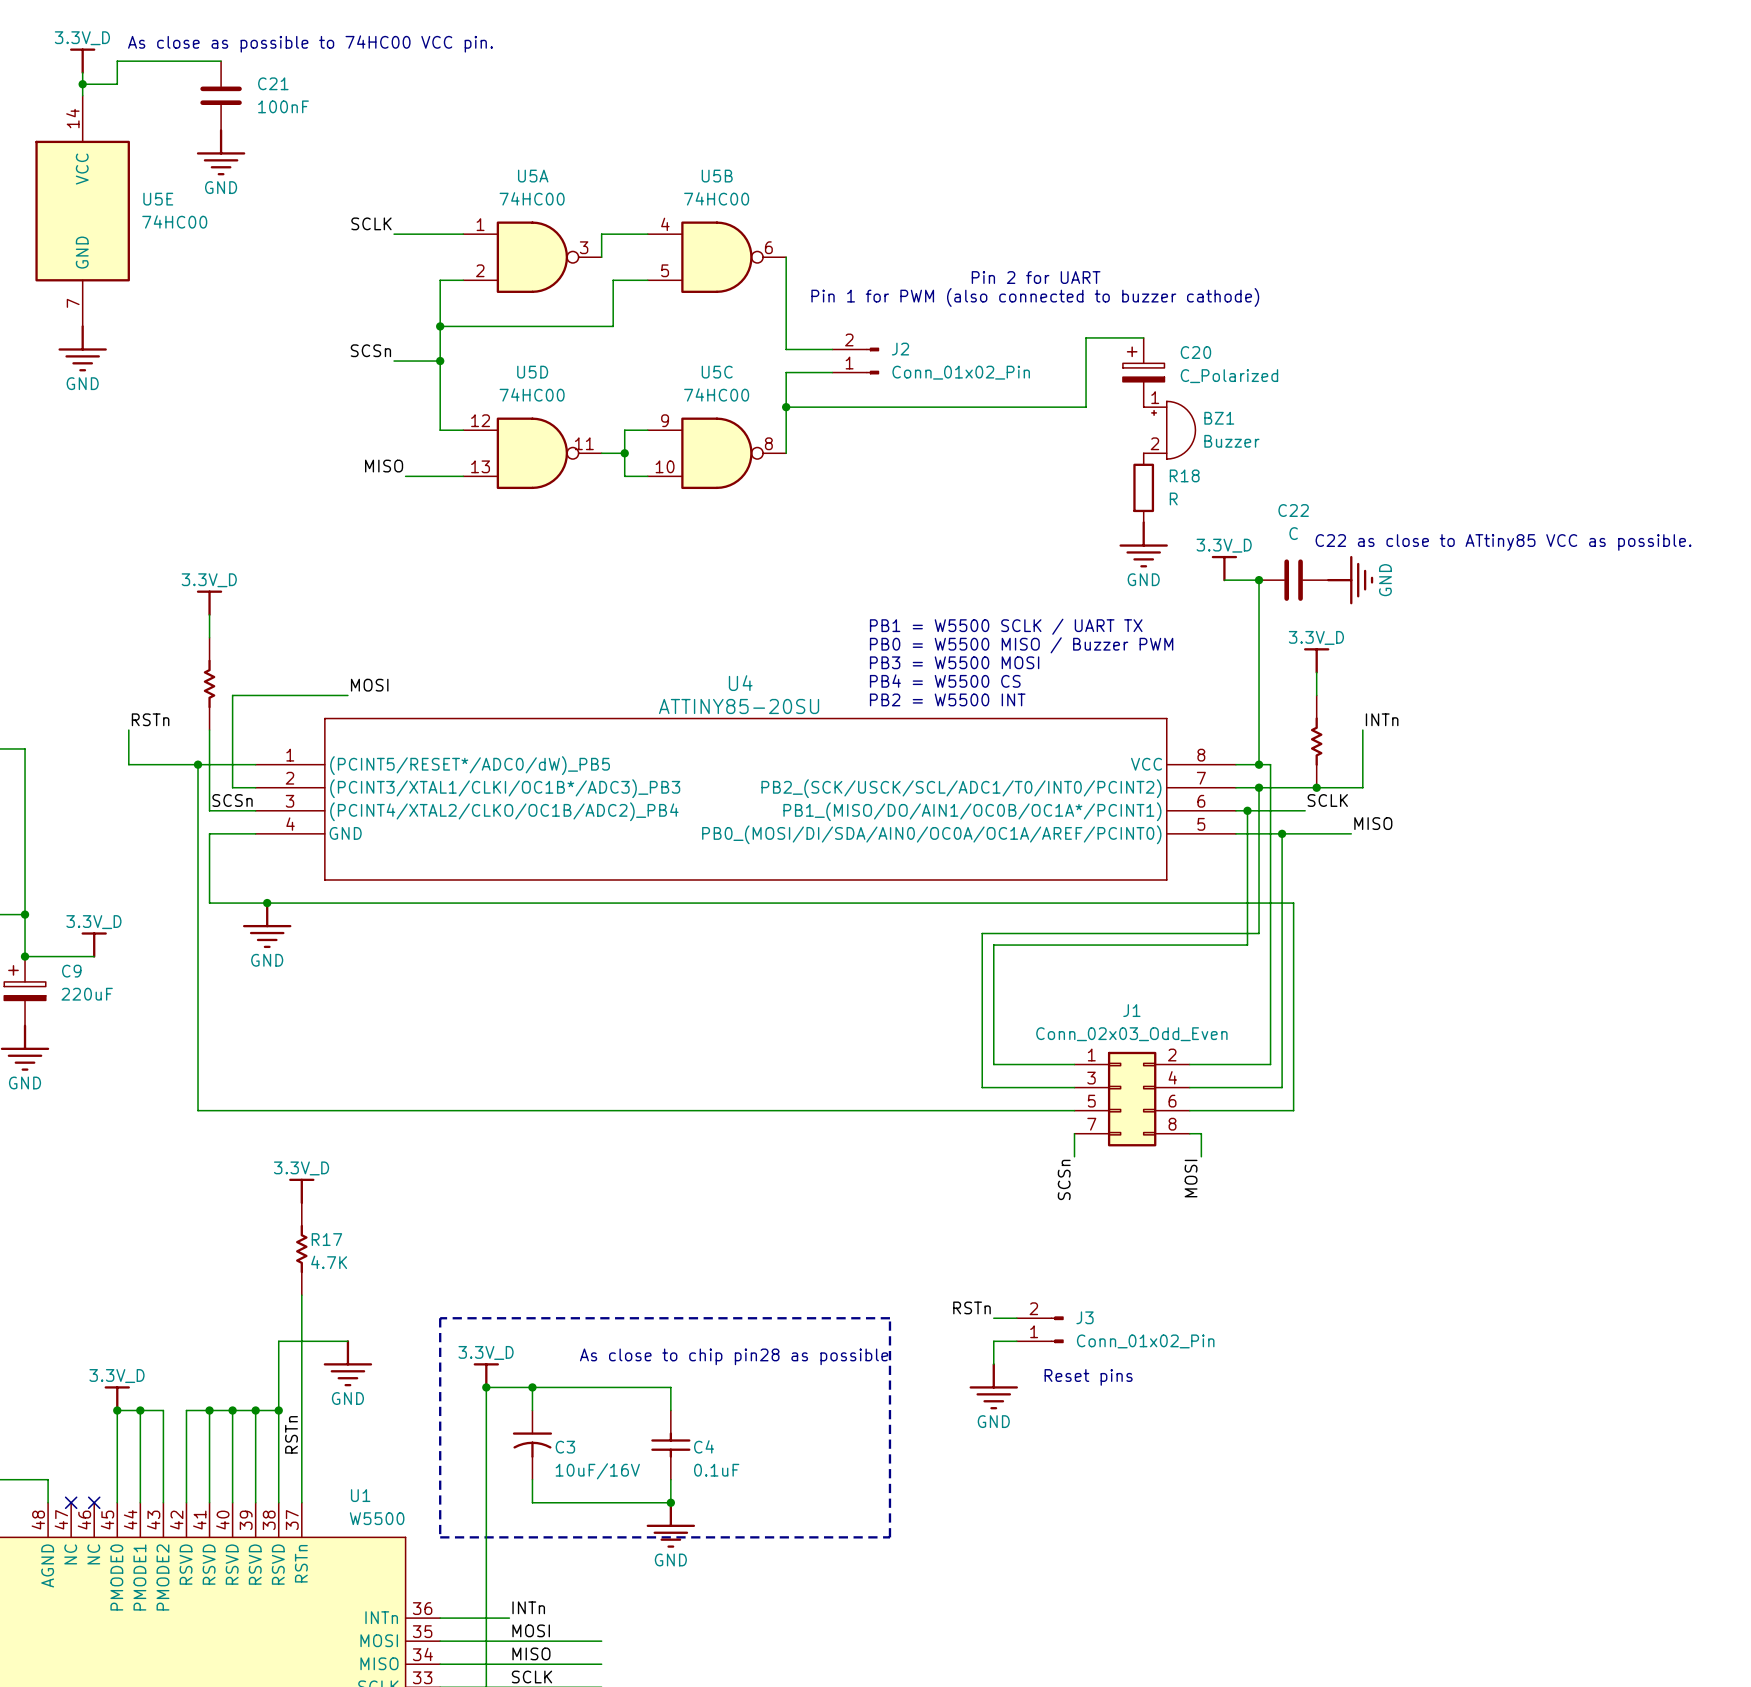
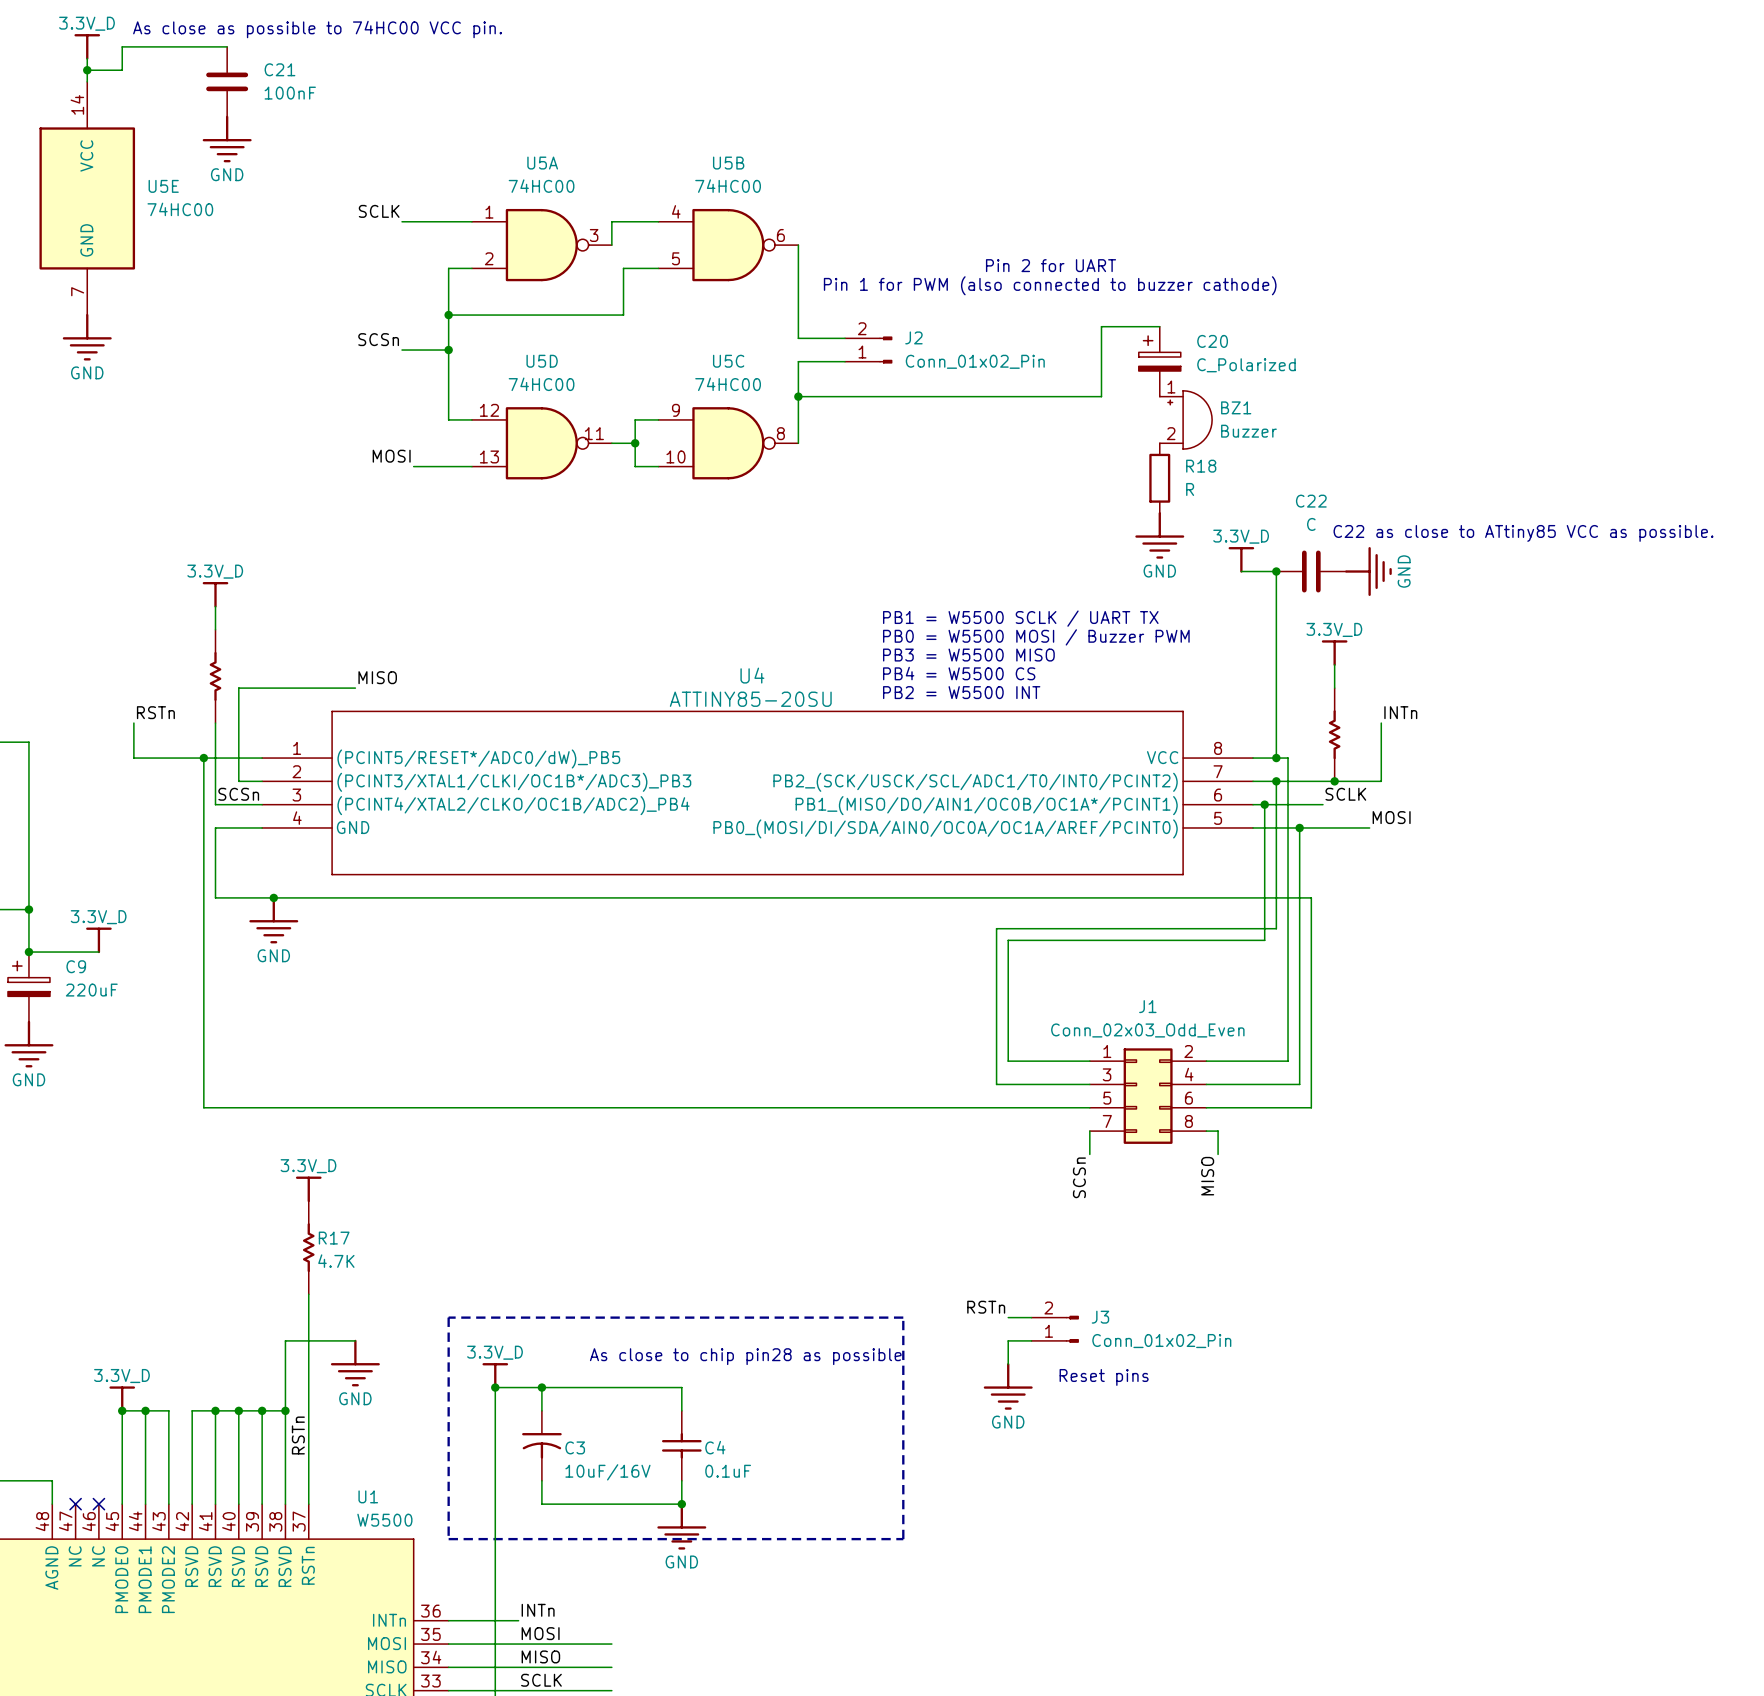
label: MISO (384, 466) -> MOSI (391, 456)
text: PB0 = W5500 MISO / Buzzer PWM (1021, 645) -> PB0 = W5500 MOSI / Buzzer PWM (1036, 637)
text: PB3 = W5500 MOSI (954, 662) -> PB3 = W5500 MISO (968, 655)
label: MOSI (369, 685) -> MISO (377, 677)
label: MISO (1373, 823) -> MOSI (1391, 817)
label: MOSI (1191, 1178) -> MISO (1207, 1176)

